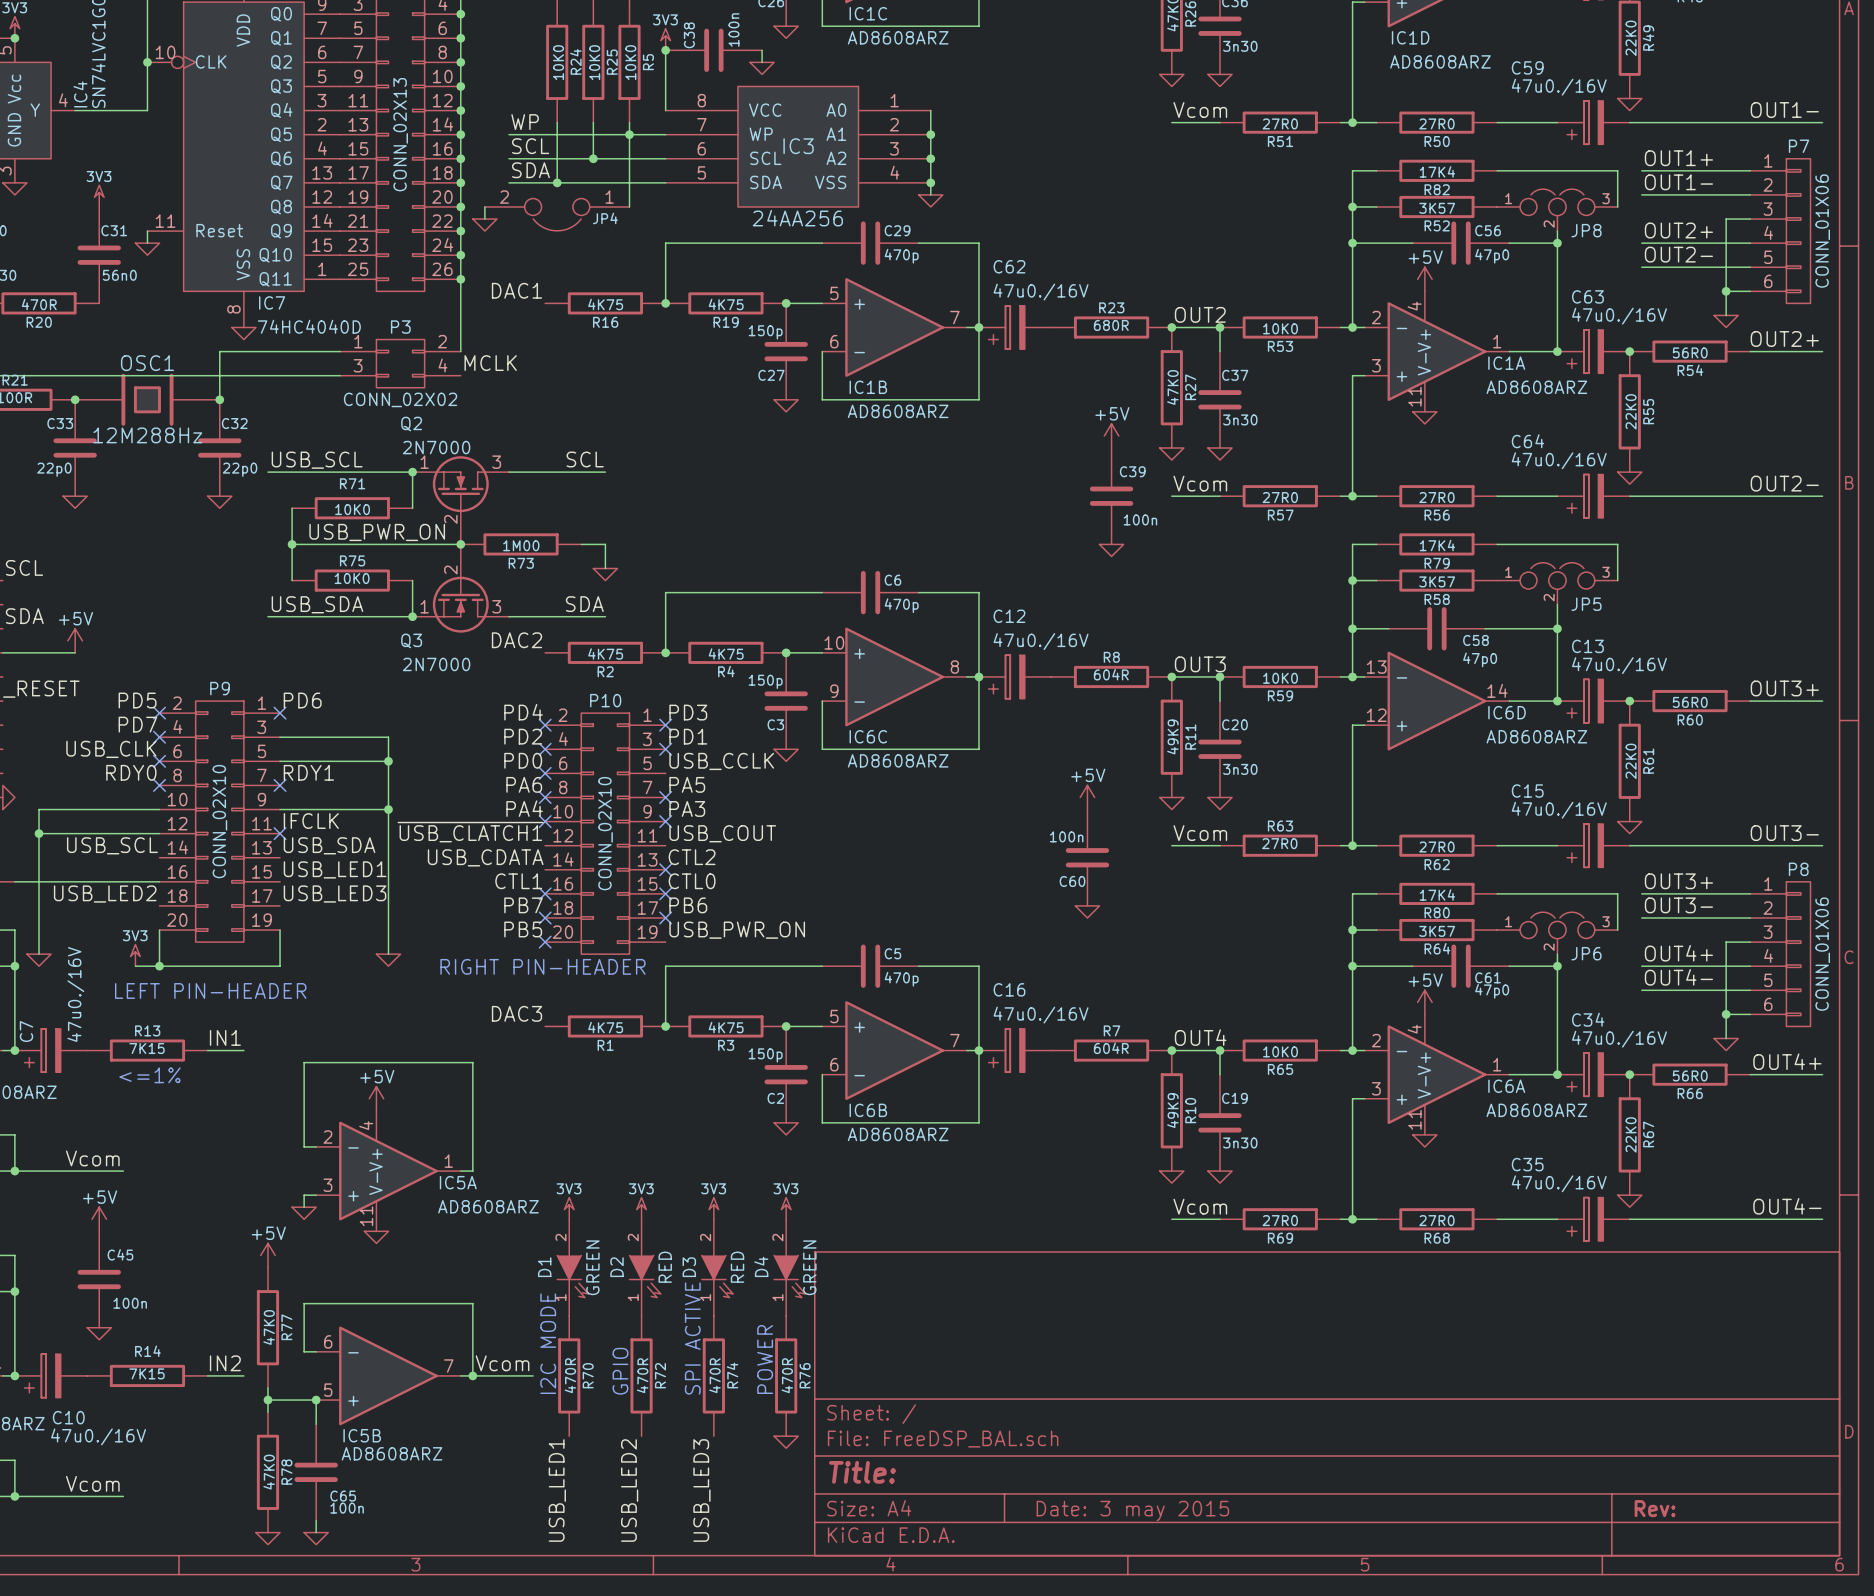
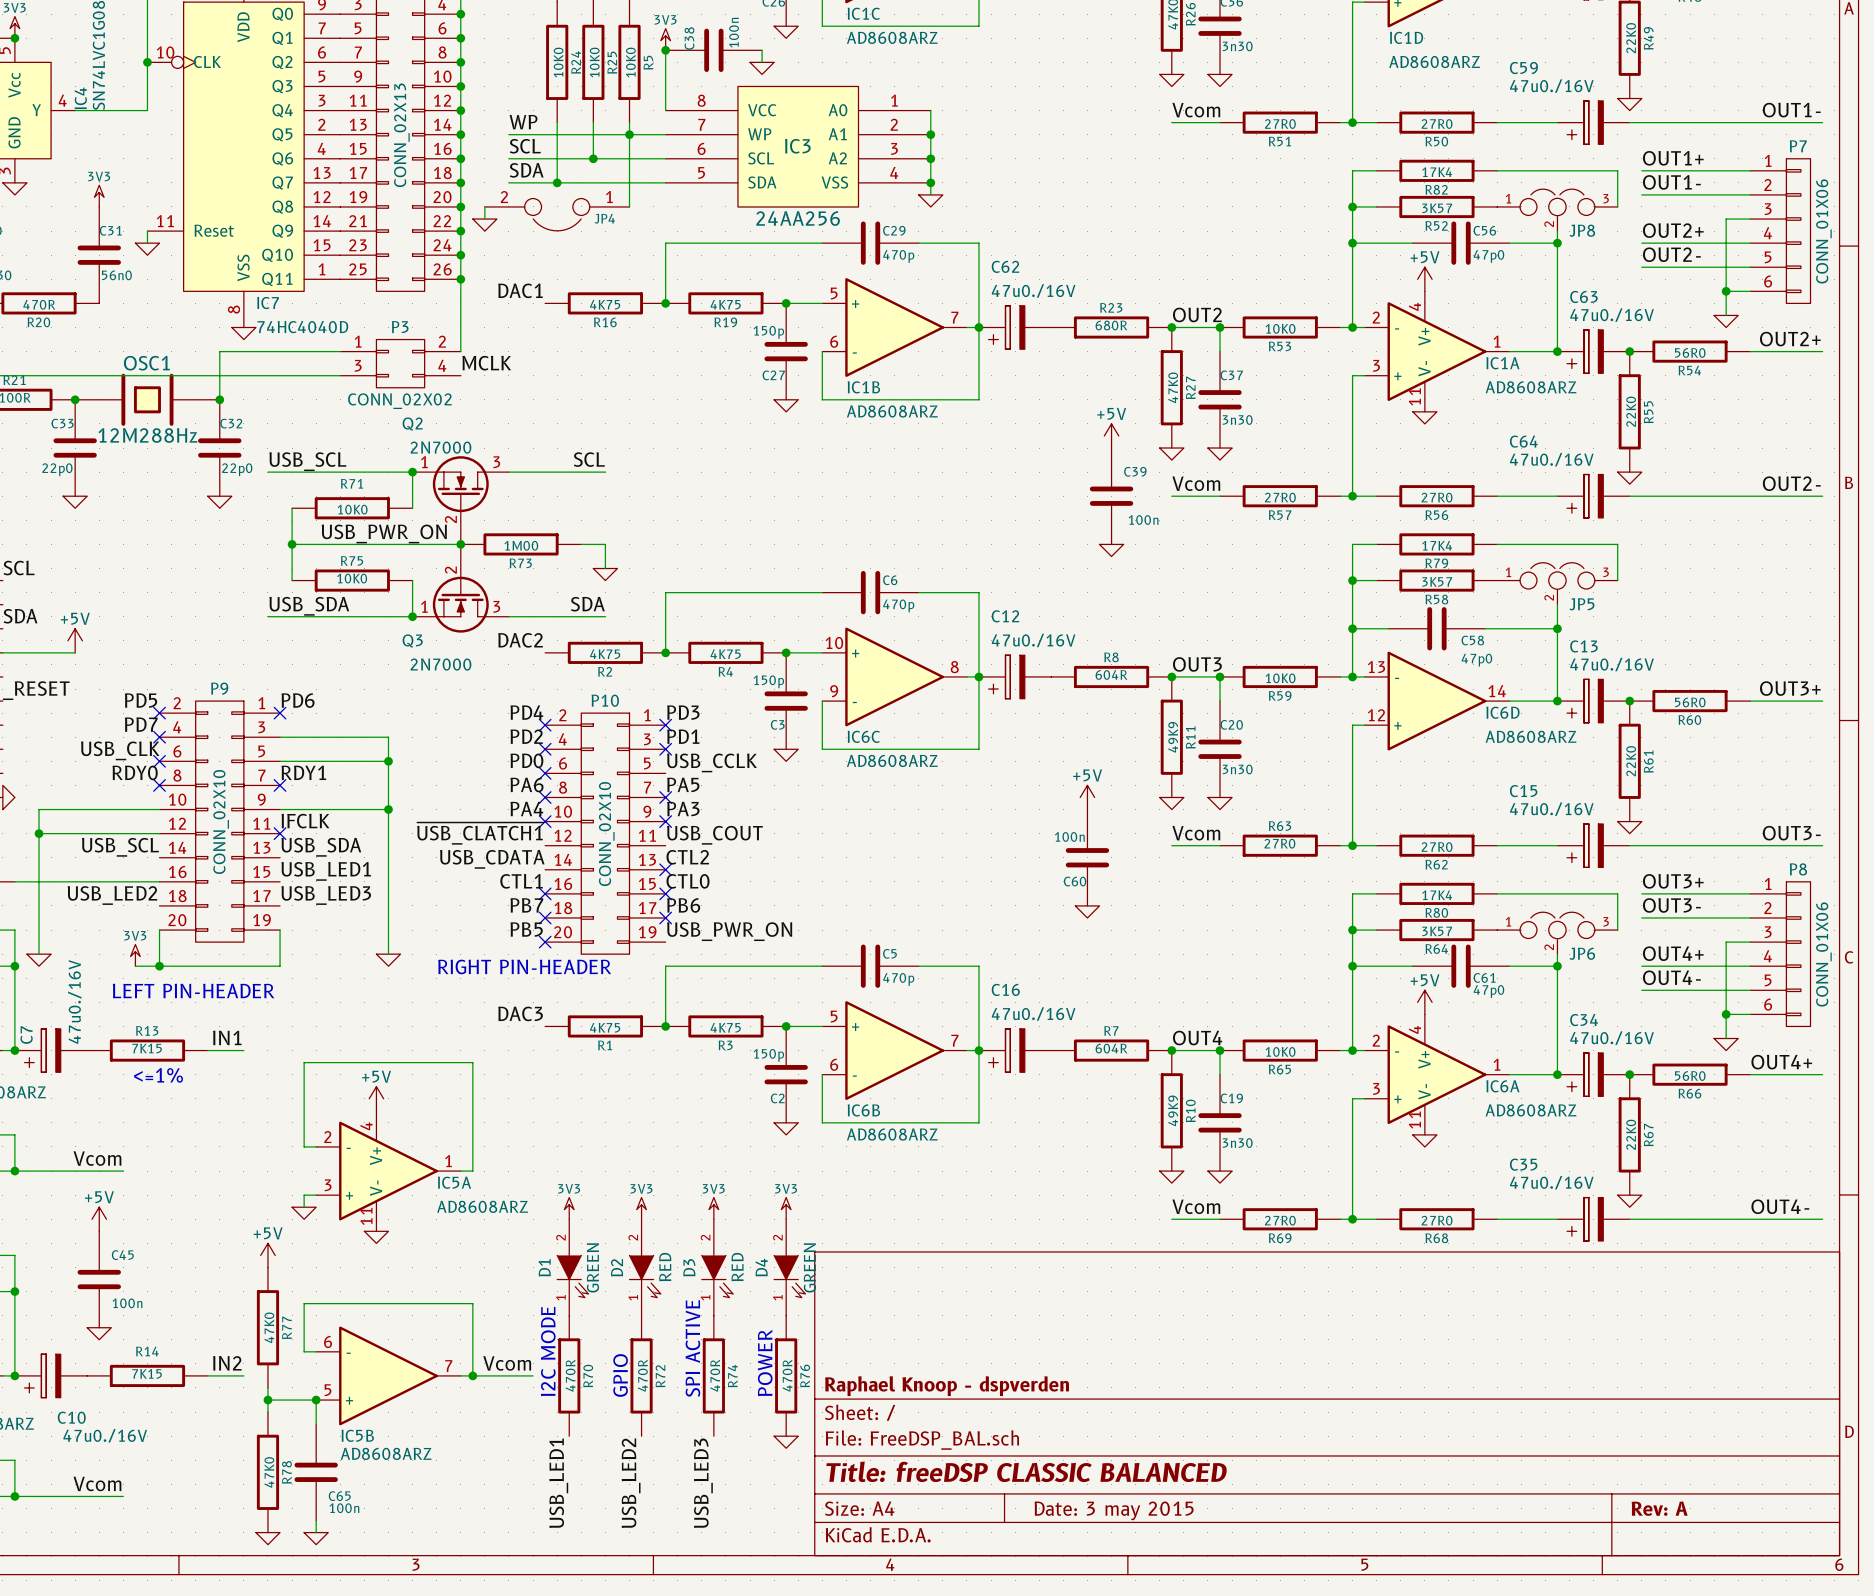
title block: none -> Raphael Knoop - dspverden (947, 1386)
title block: Title: (862, 1472) -> Title: freeDSP CLASSIC BALANCED (1026, 1471)
title block: Rev: (1655, 1508) -> Rev: A (1659, 1508)

